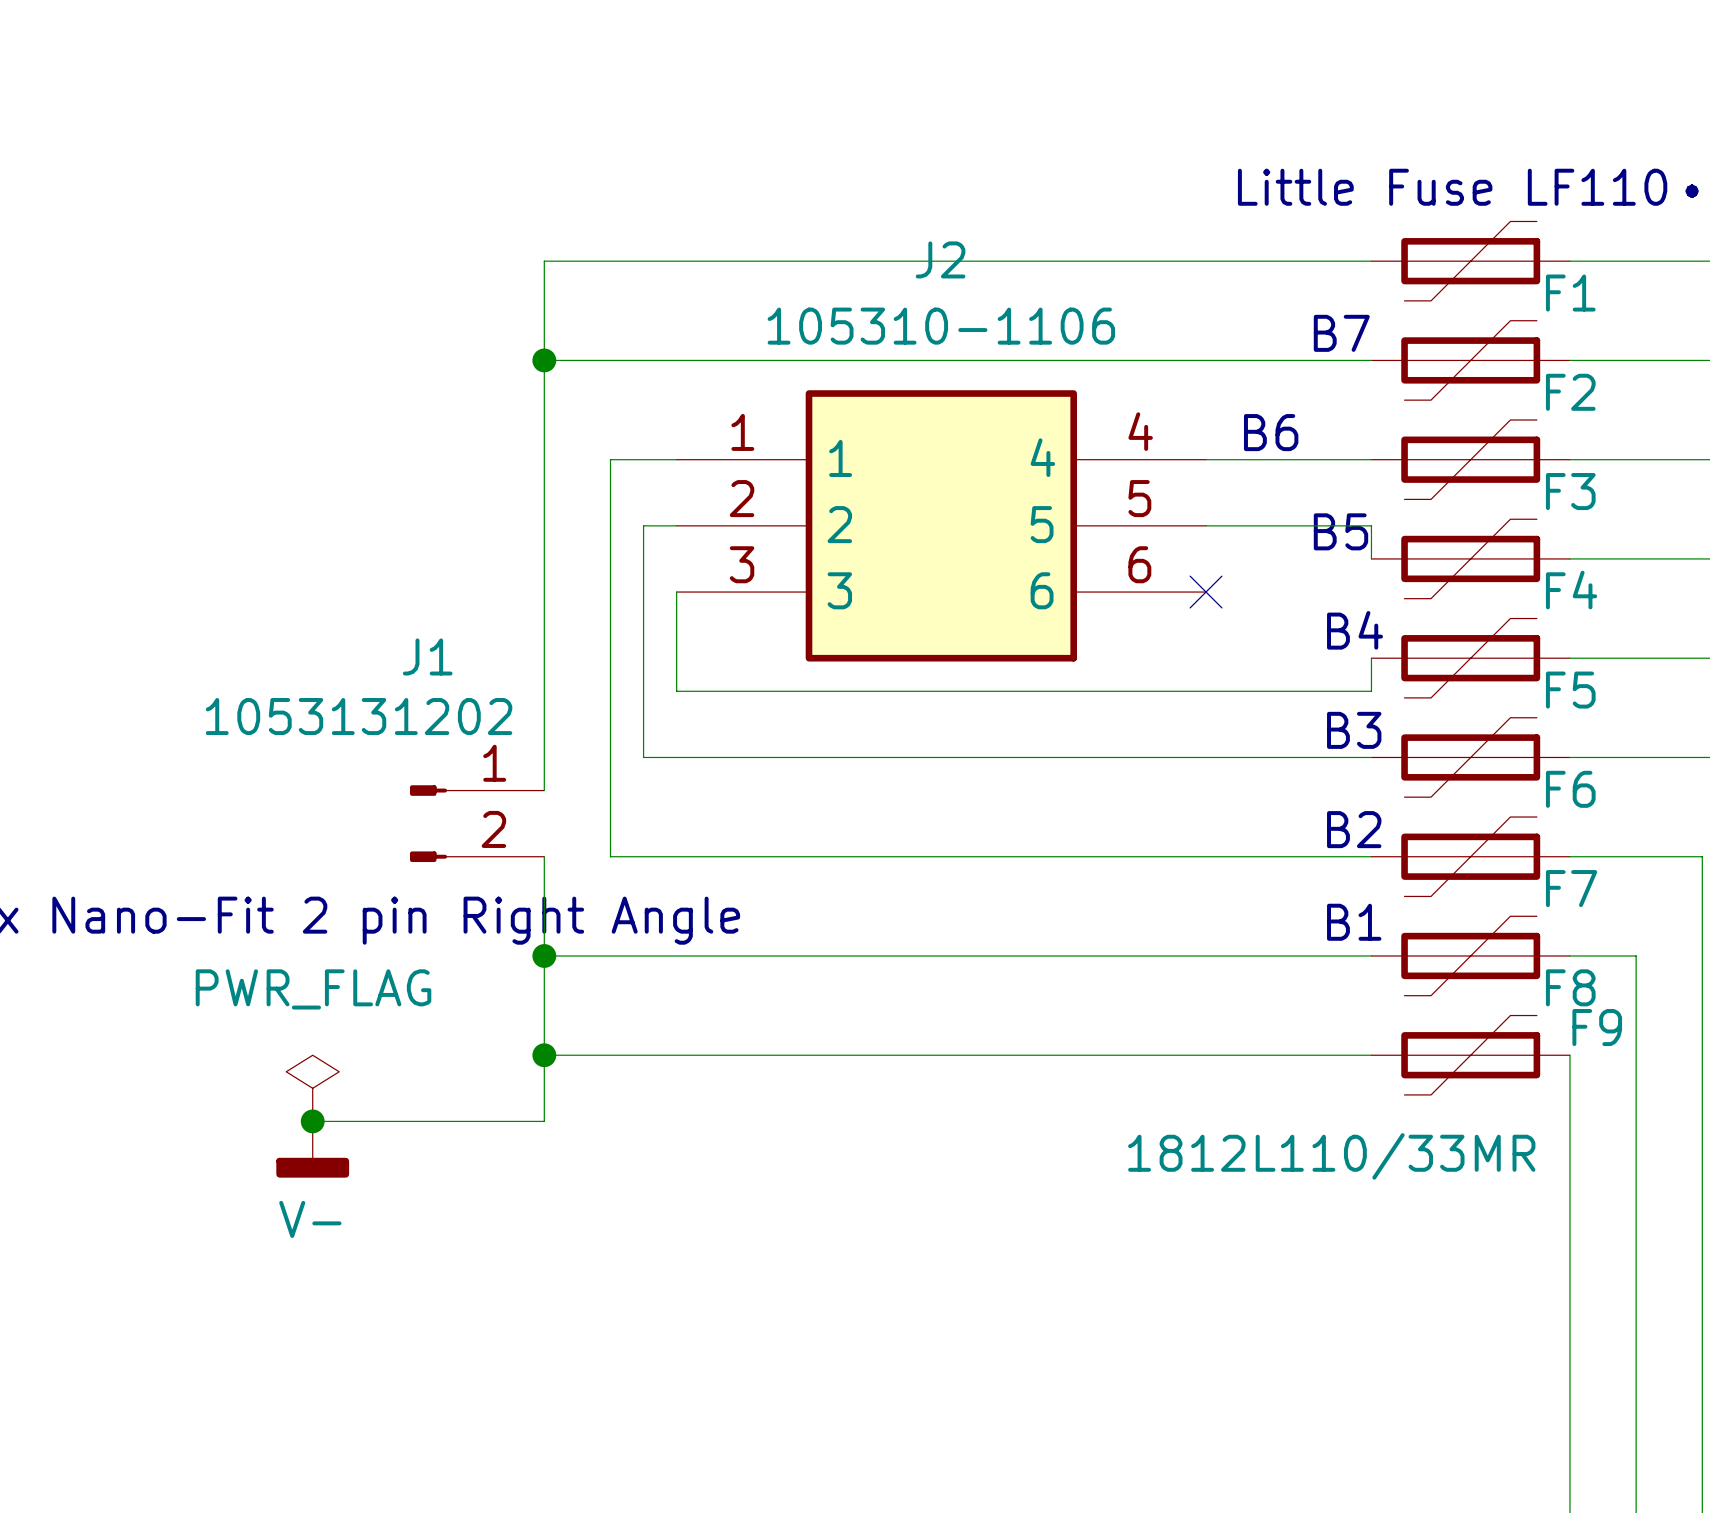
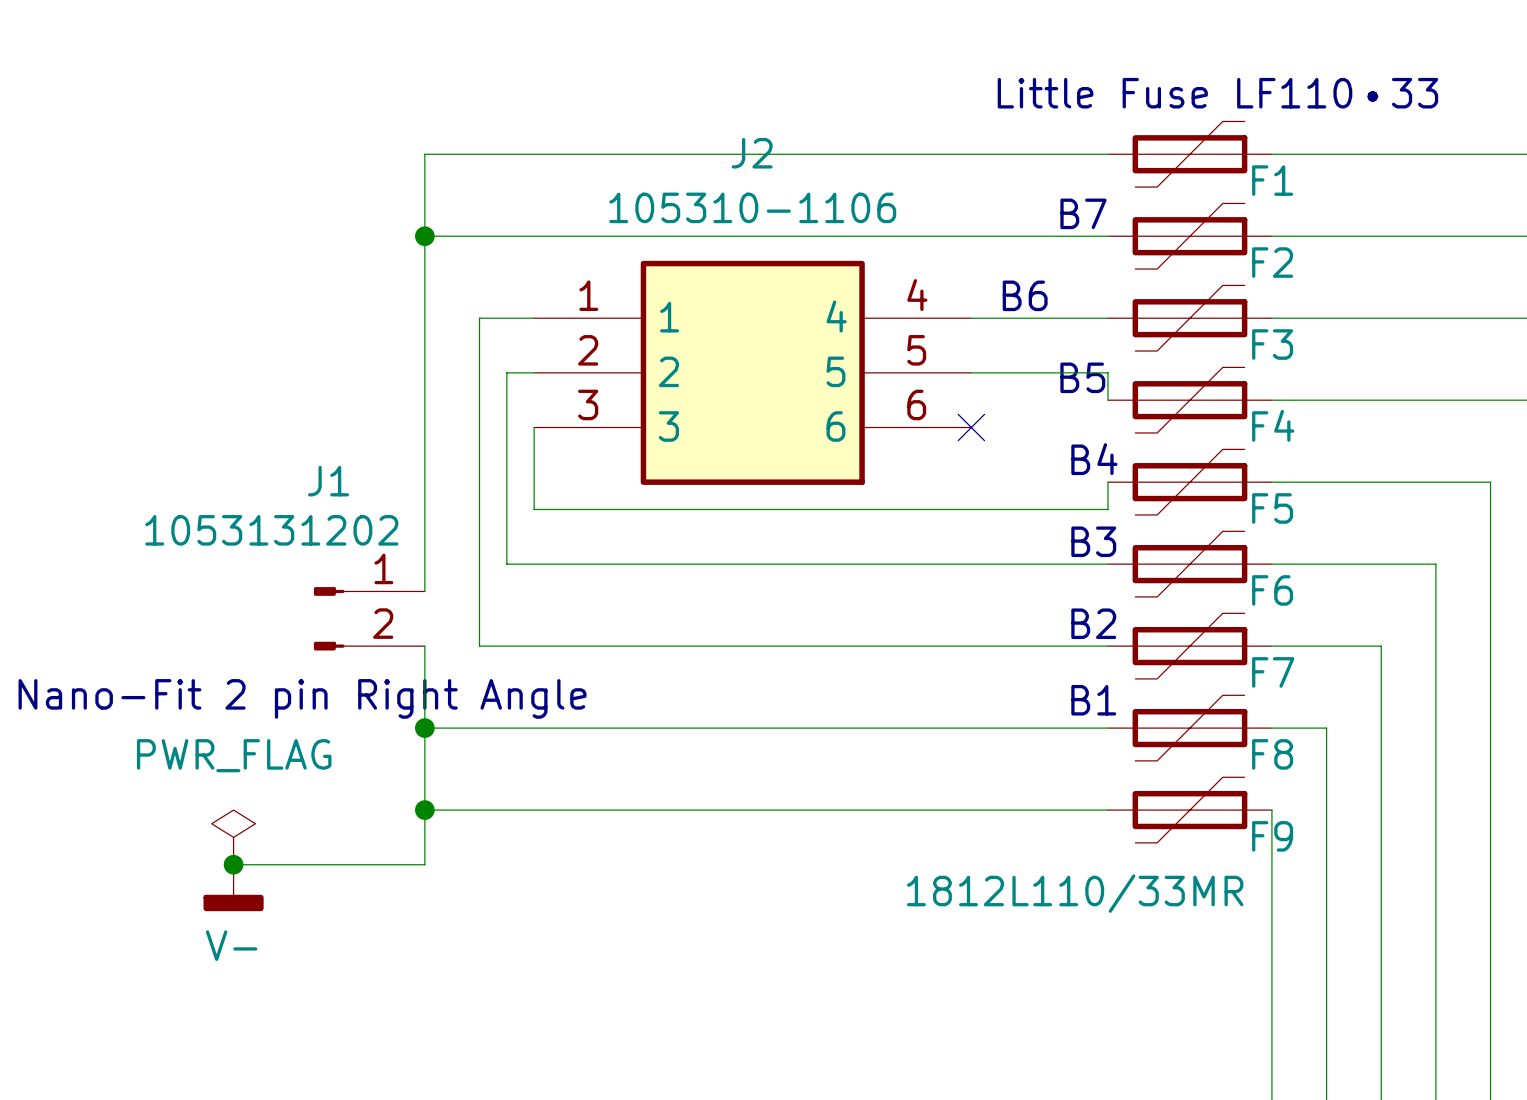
F9 name position: F9 (1597, 1027) -> F9 (1272, 836)

